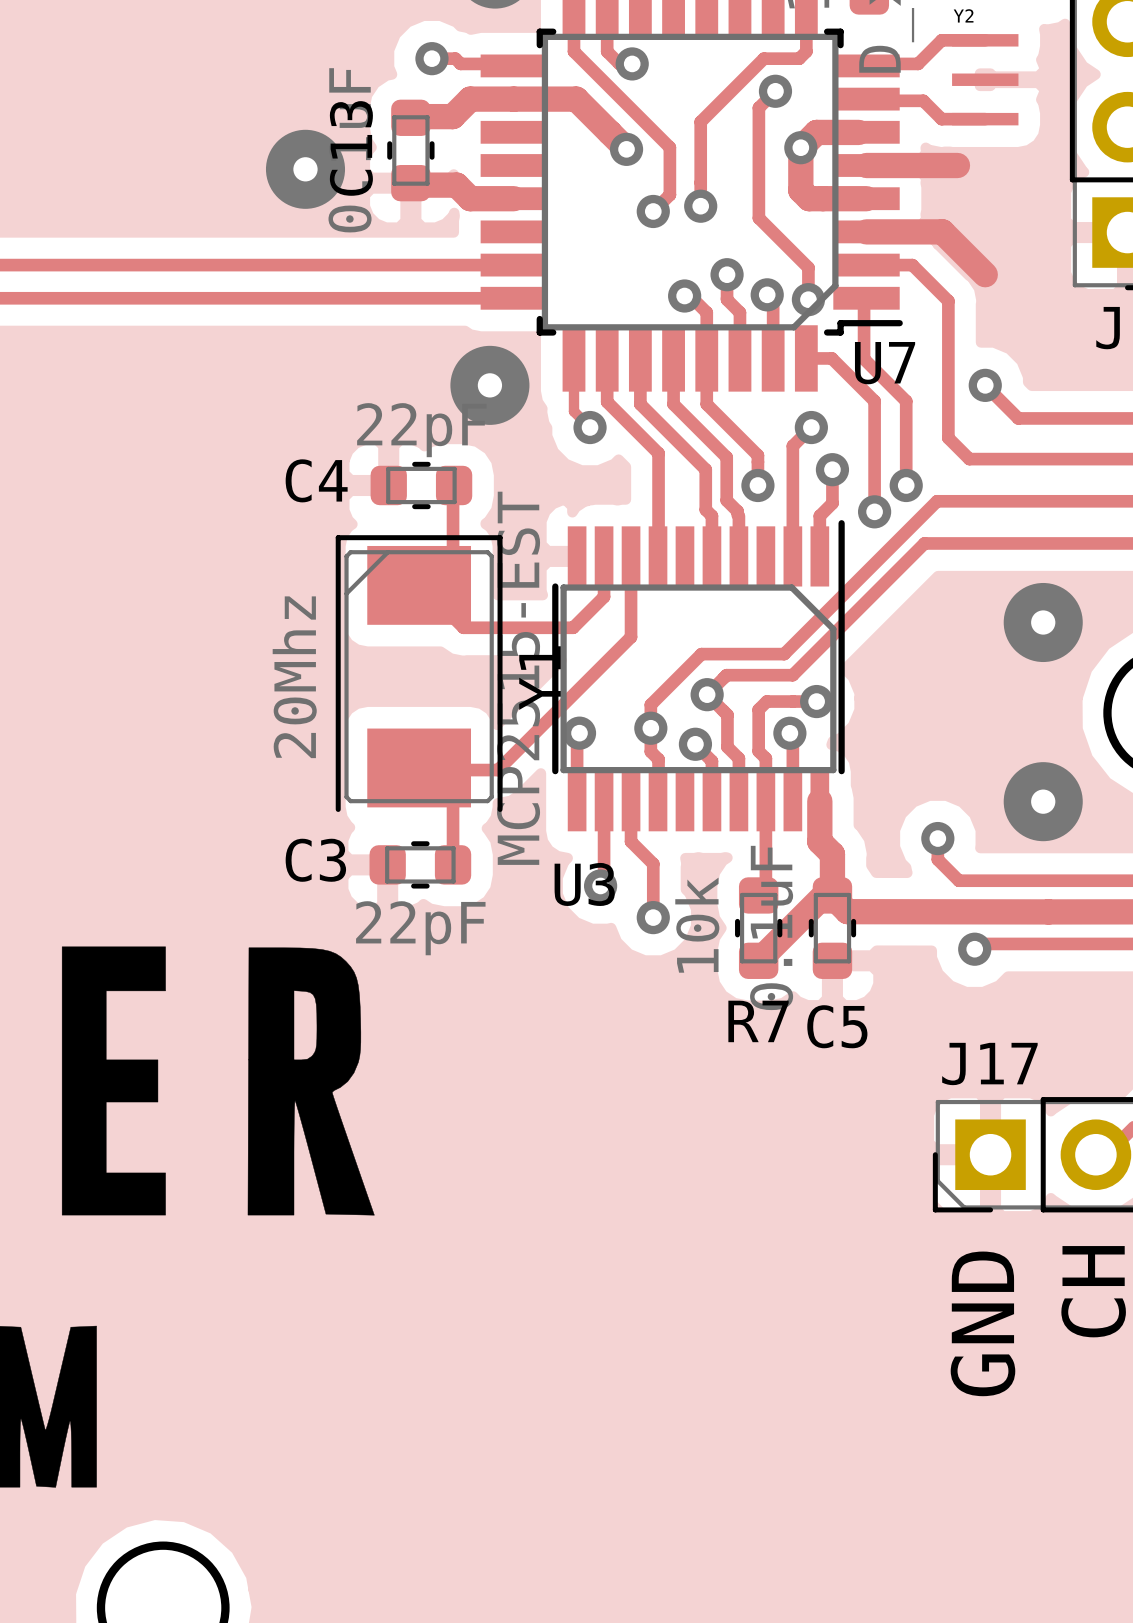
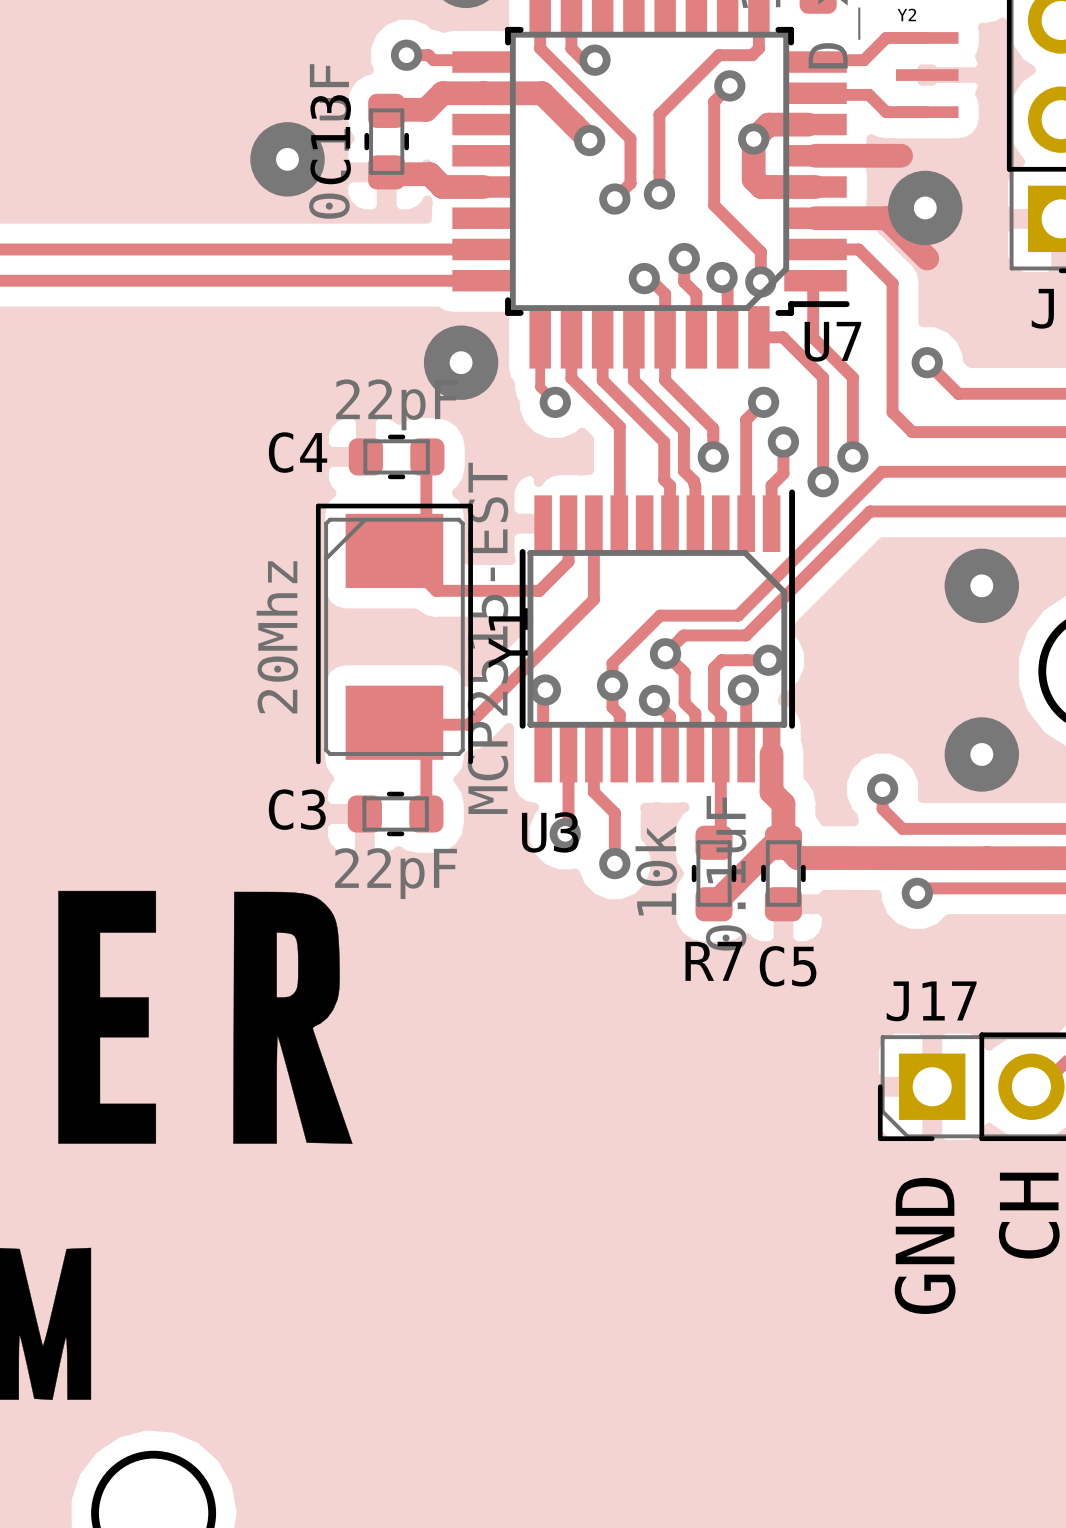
via: none -> (925, 207)

